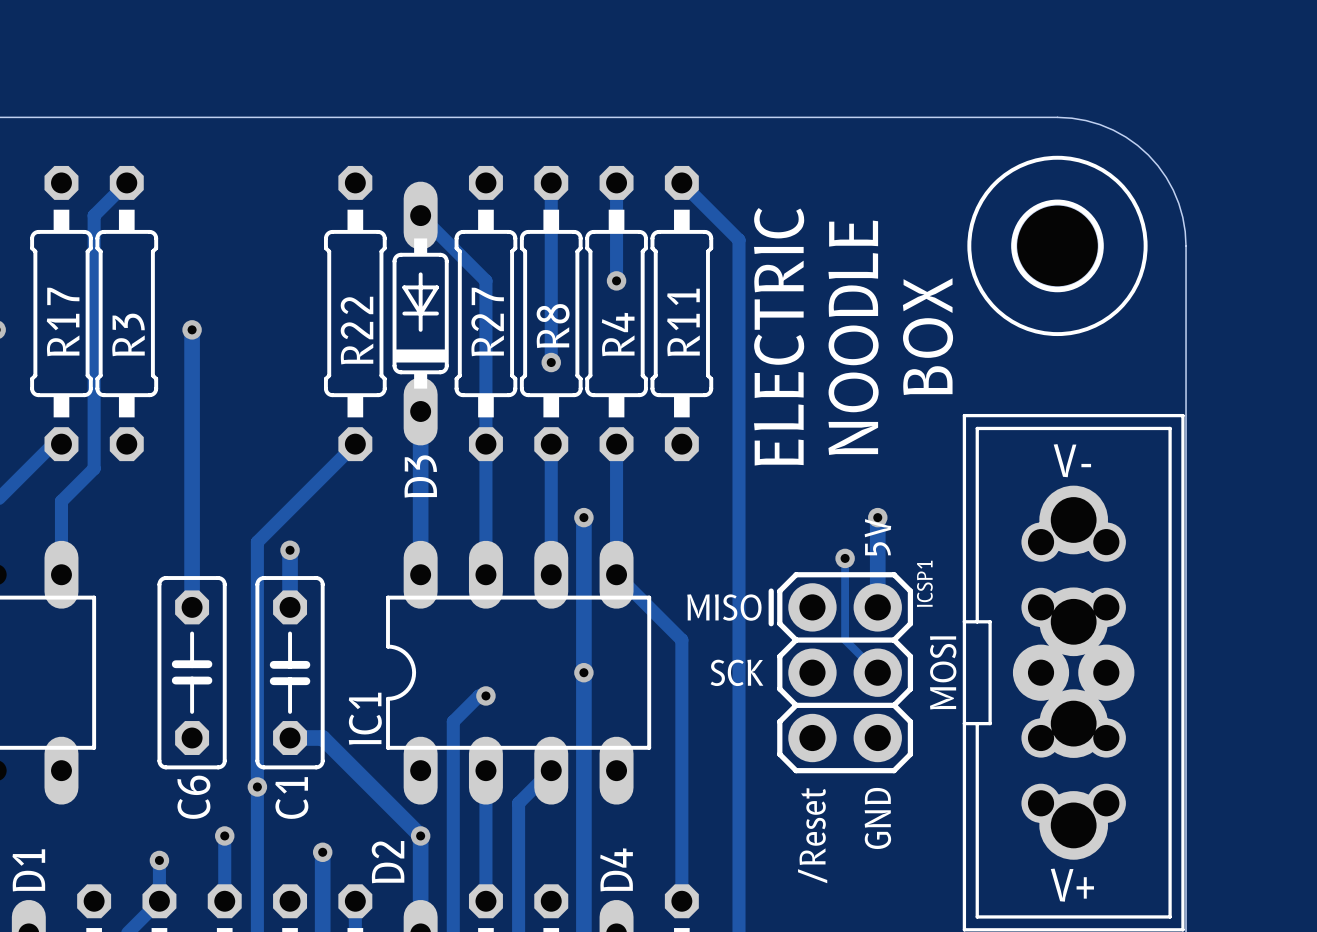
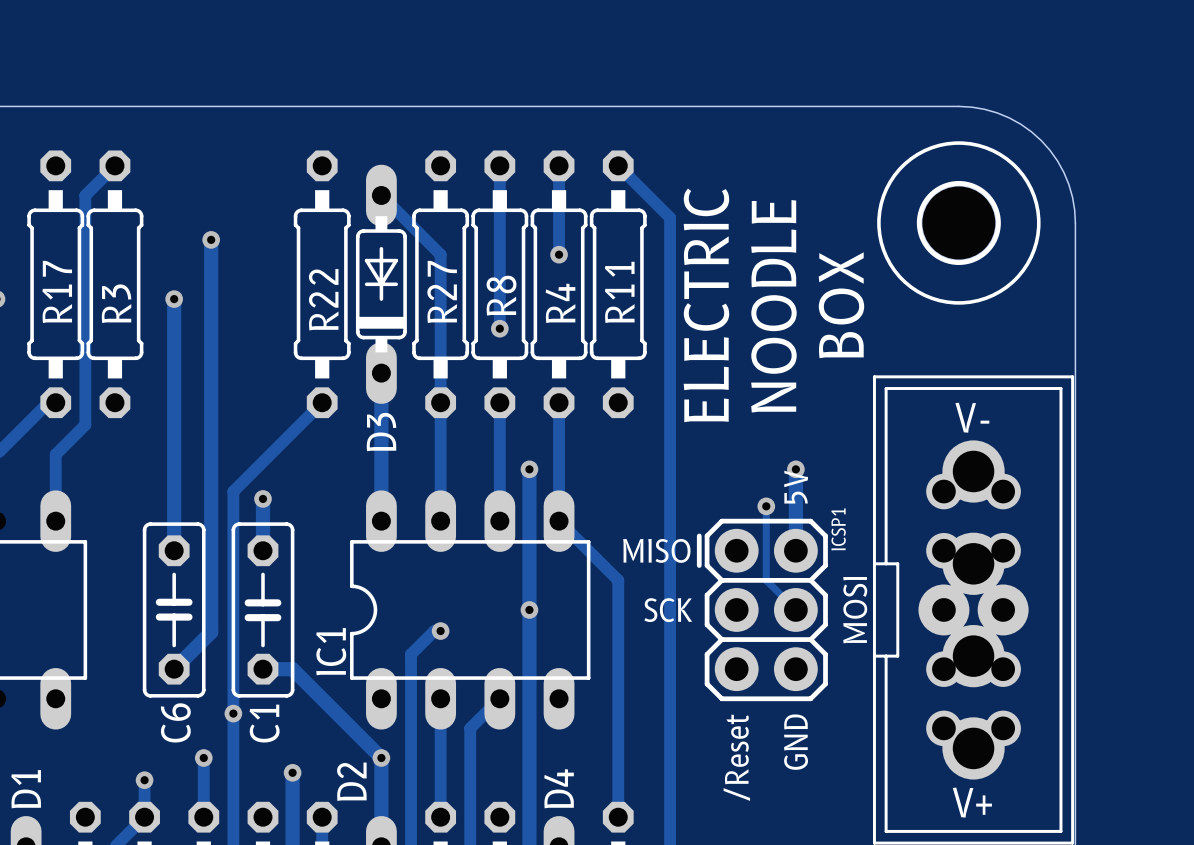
track: none -> (211, 239) (211, 632) (174, 669)
via: none -> (211, 239)

